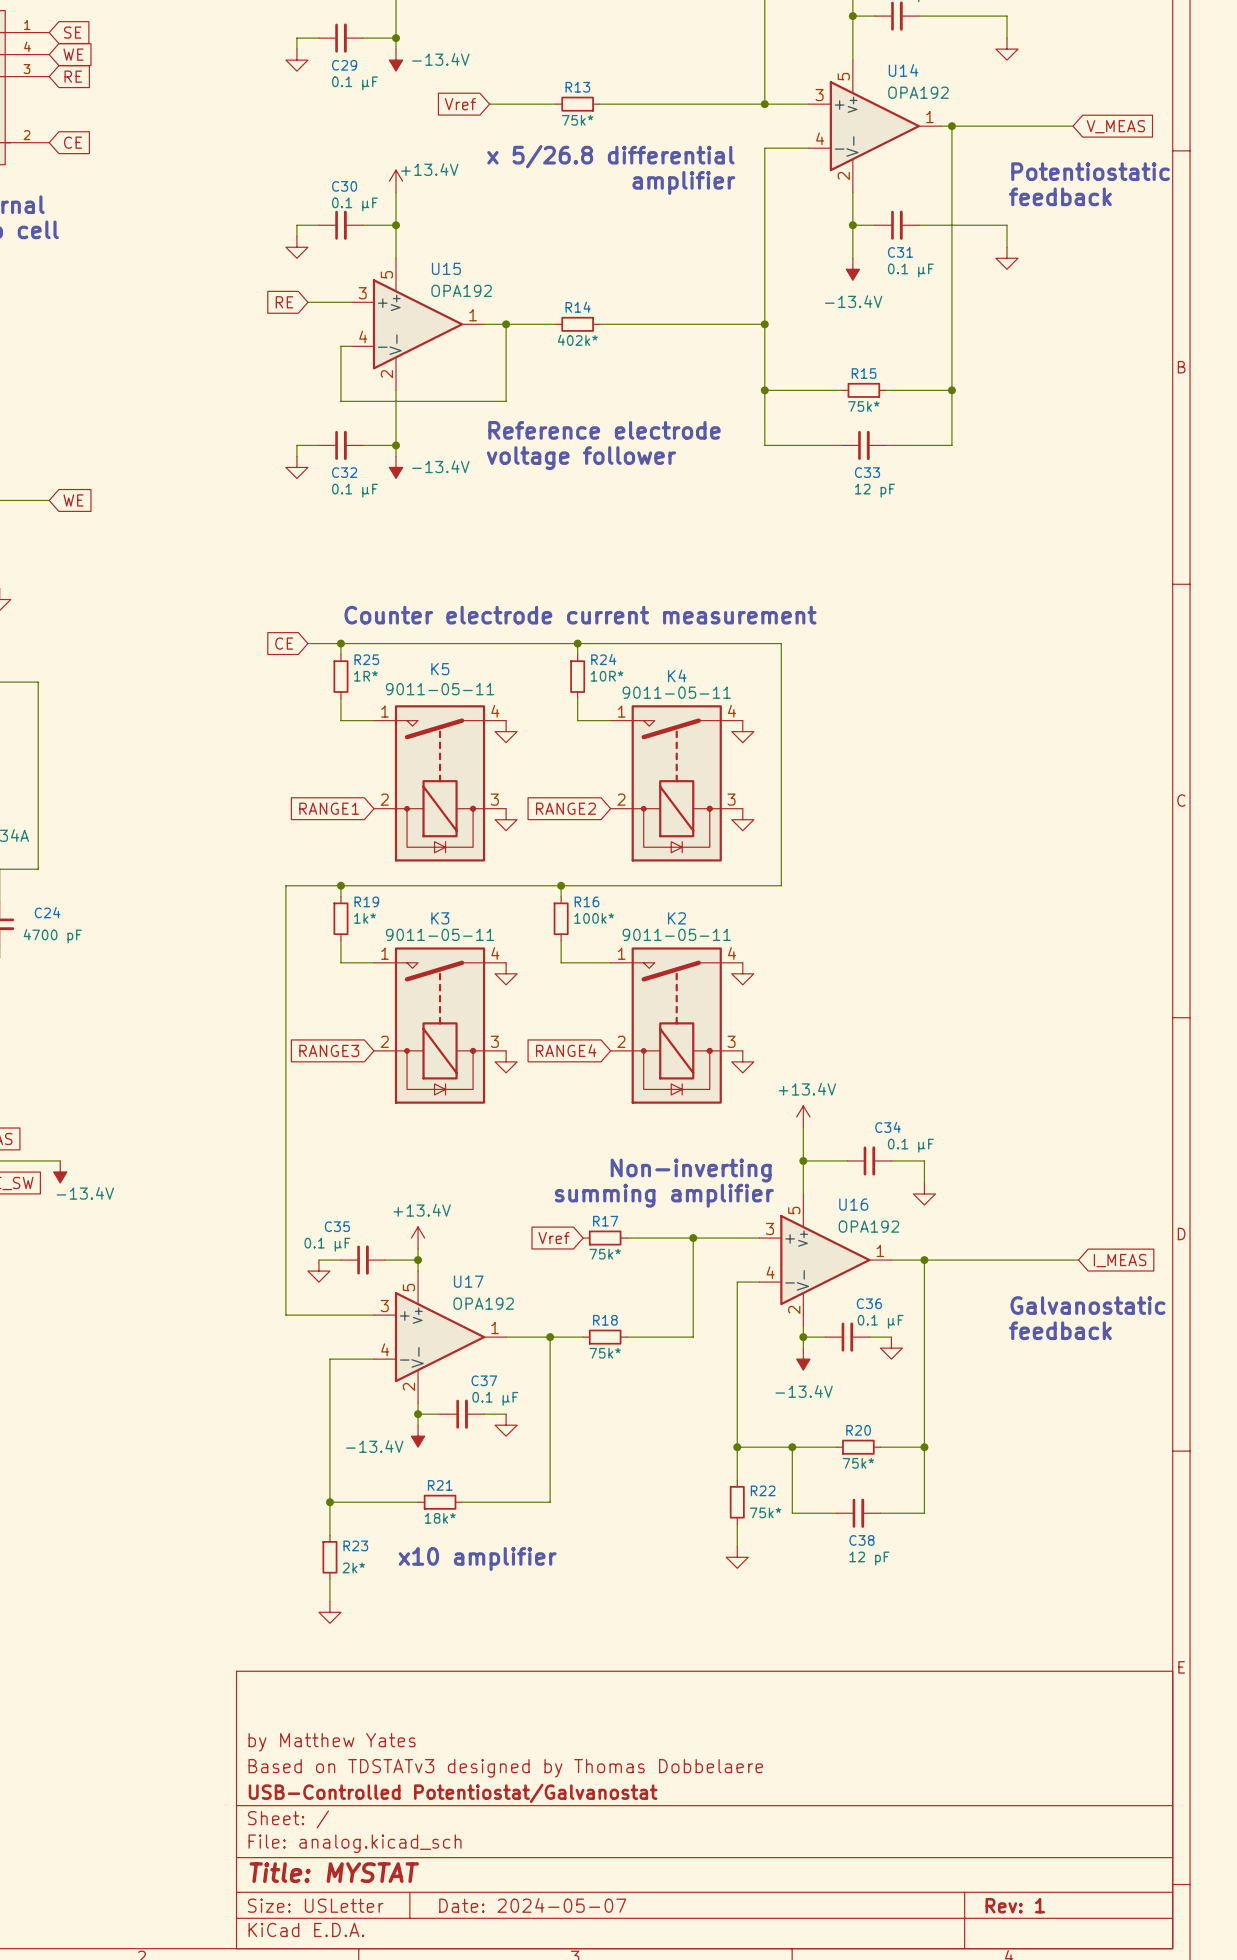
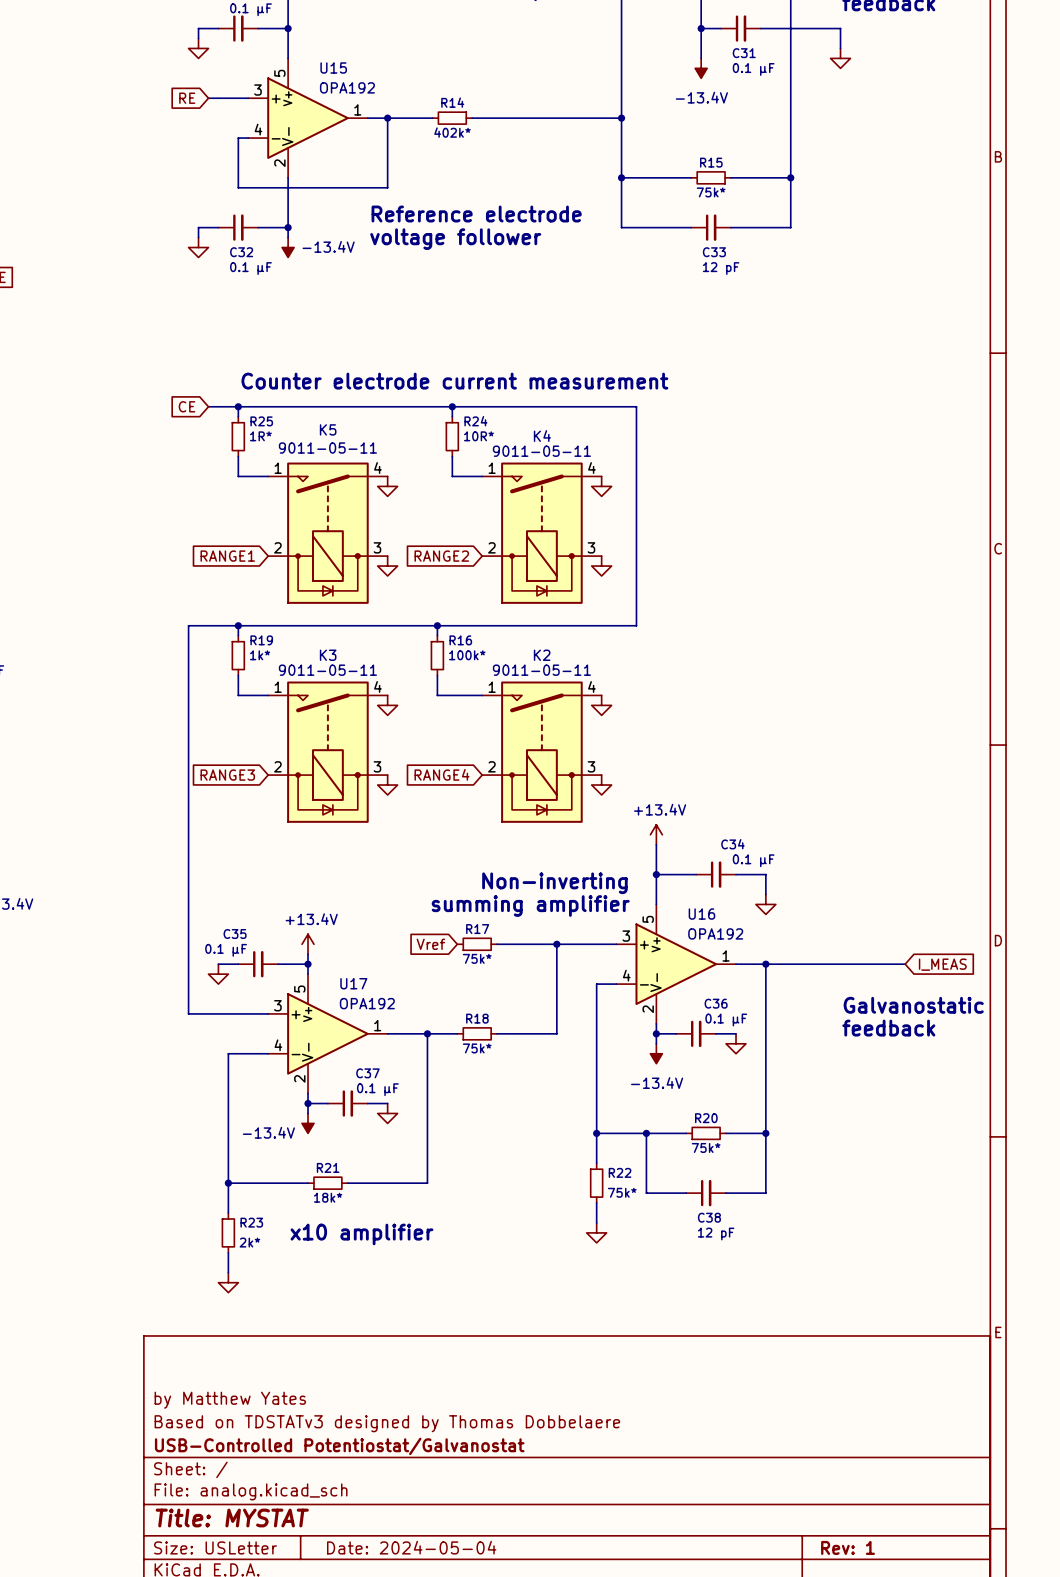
title block: Date: 2024-05-07 (532, 1905) -> Date: 2024-05-04 (411, 1547)

